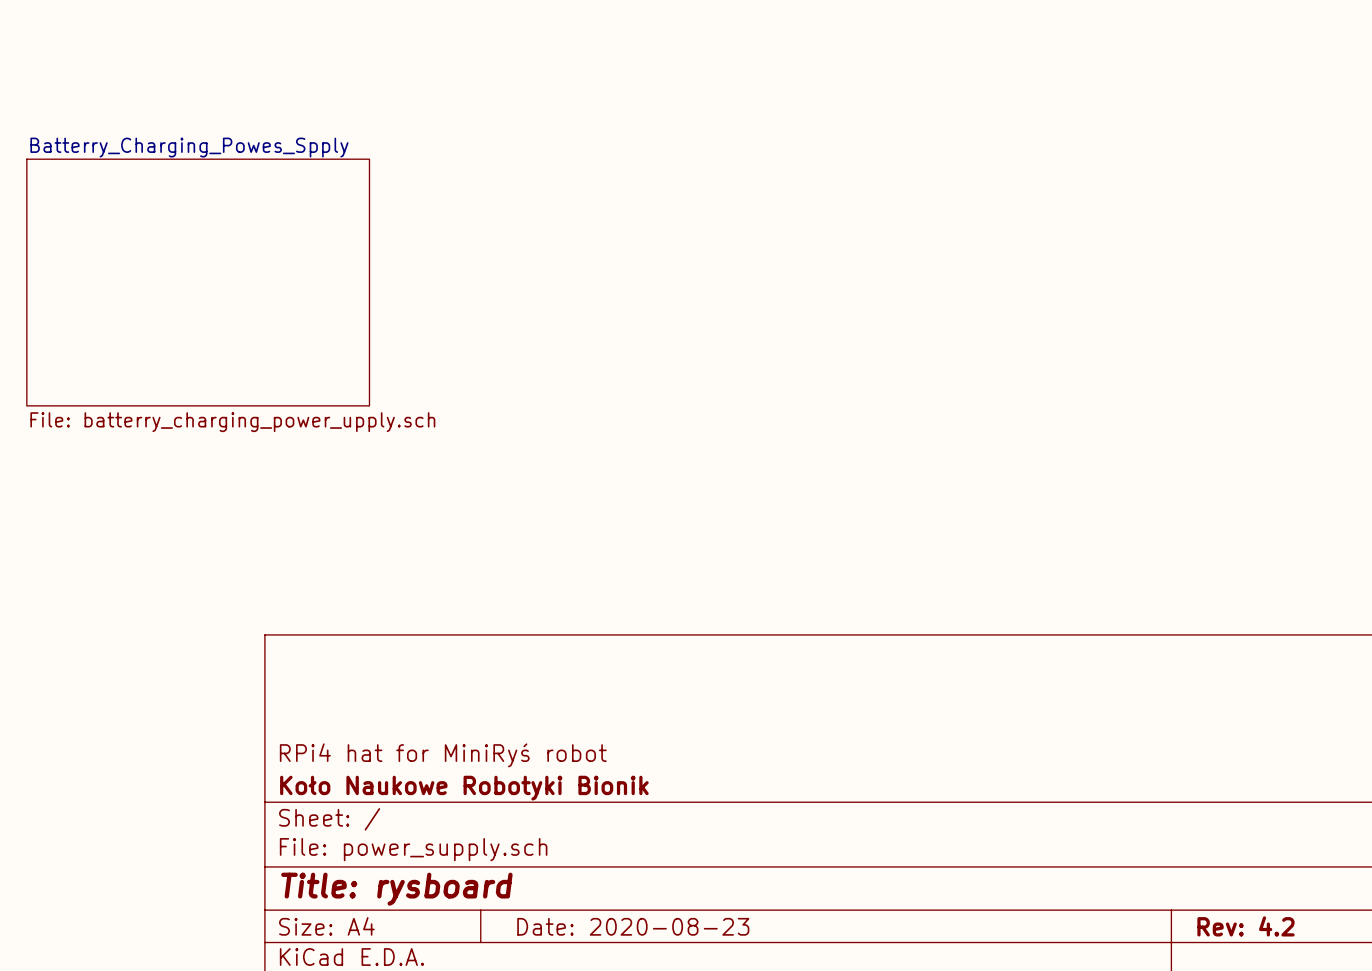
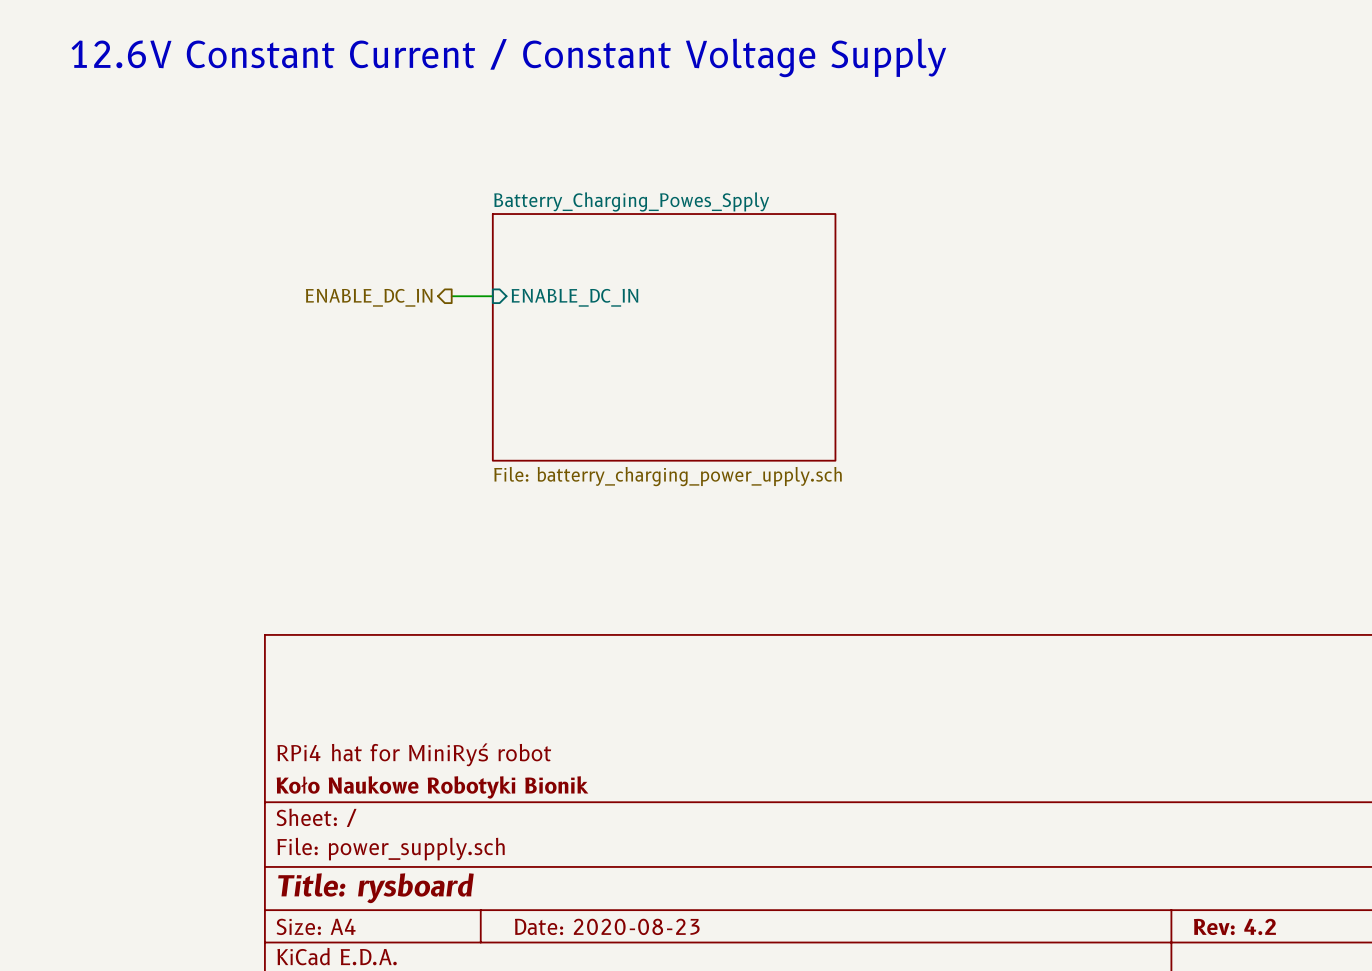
text: none -> 12.6V Constant Current / Constant Voltage Supply (508, 57)
sheet Batterry_Charging_Powes_Spply: File: batterry_charging_power_upply.sch (198, 282) -> none
hierarchical label: none -> ENABLE_DC_IN (369, 297)
wire: none -> (451, 296) (492, 296)
sheet pin: none -> ENABLE_DC_IN (574, 297)
sheet Batterry_Charging_Powes_Spply: none -> File: batterry_charging_power_upply.sch (664, 337)

